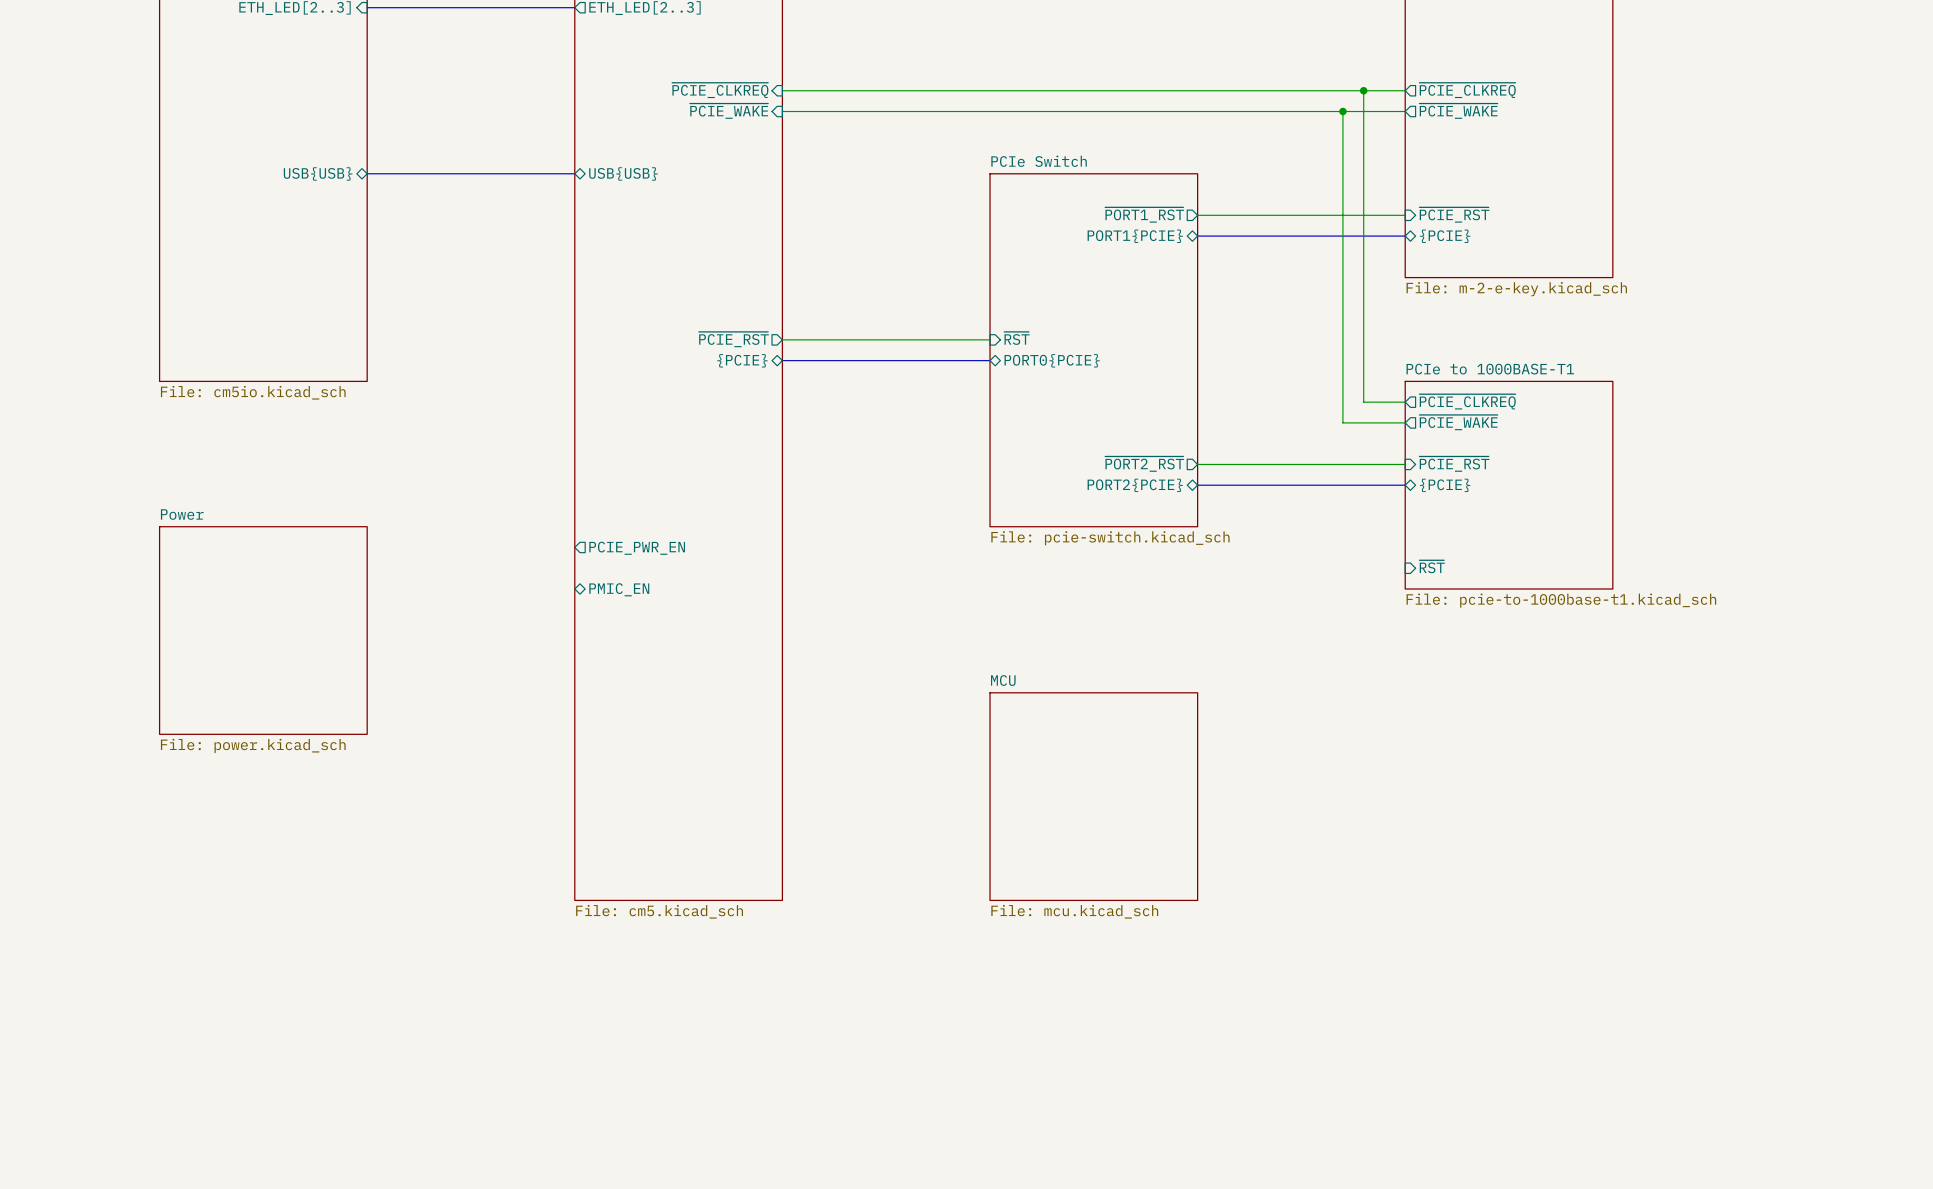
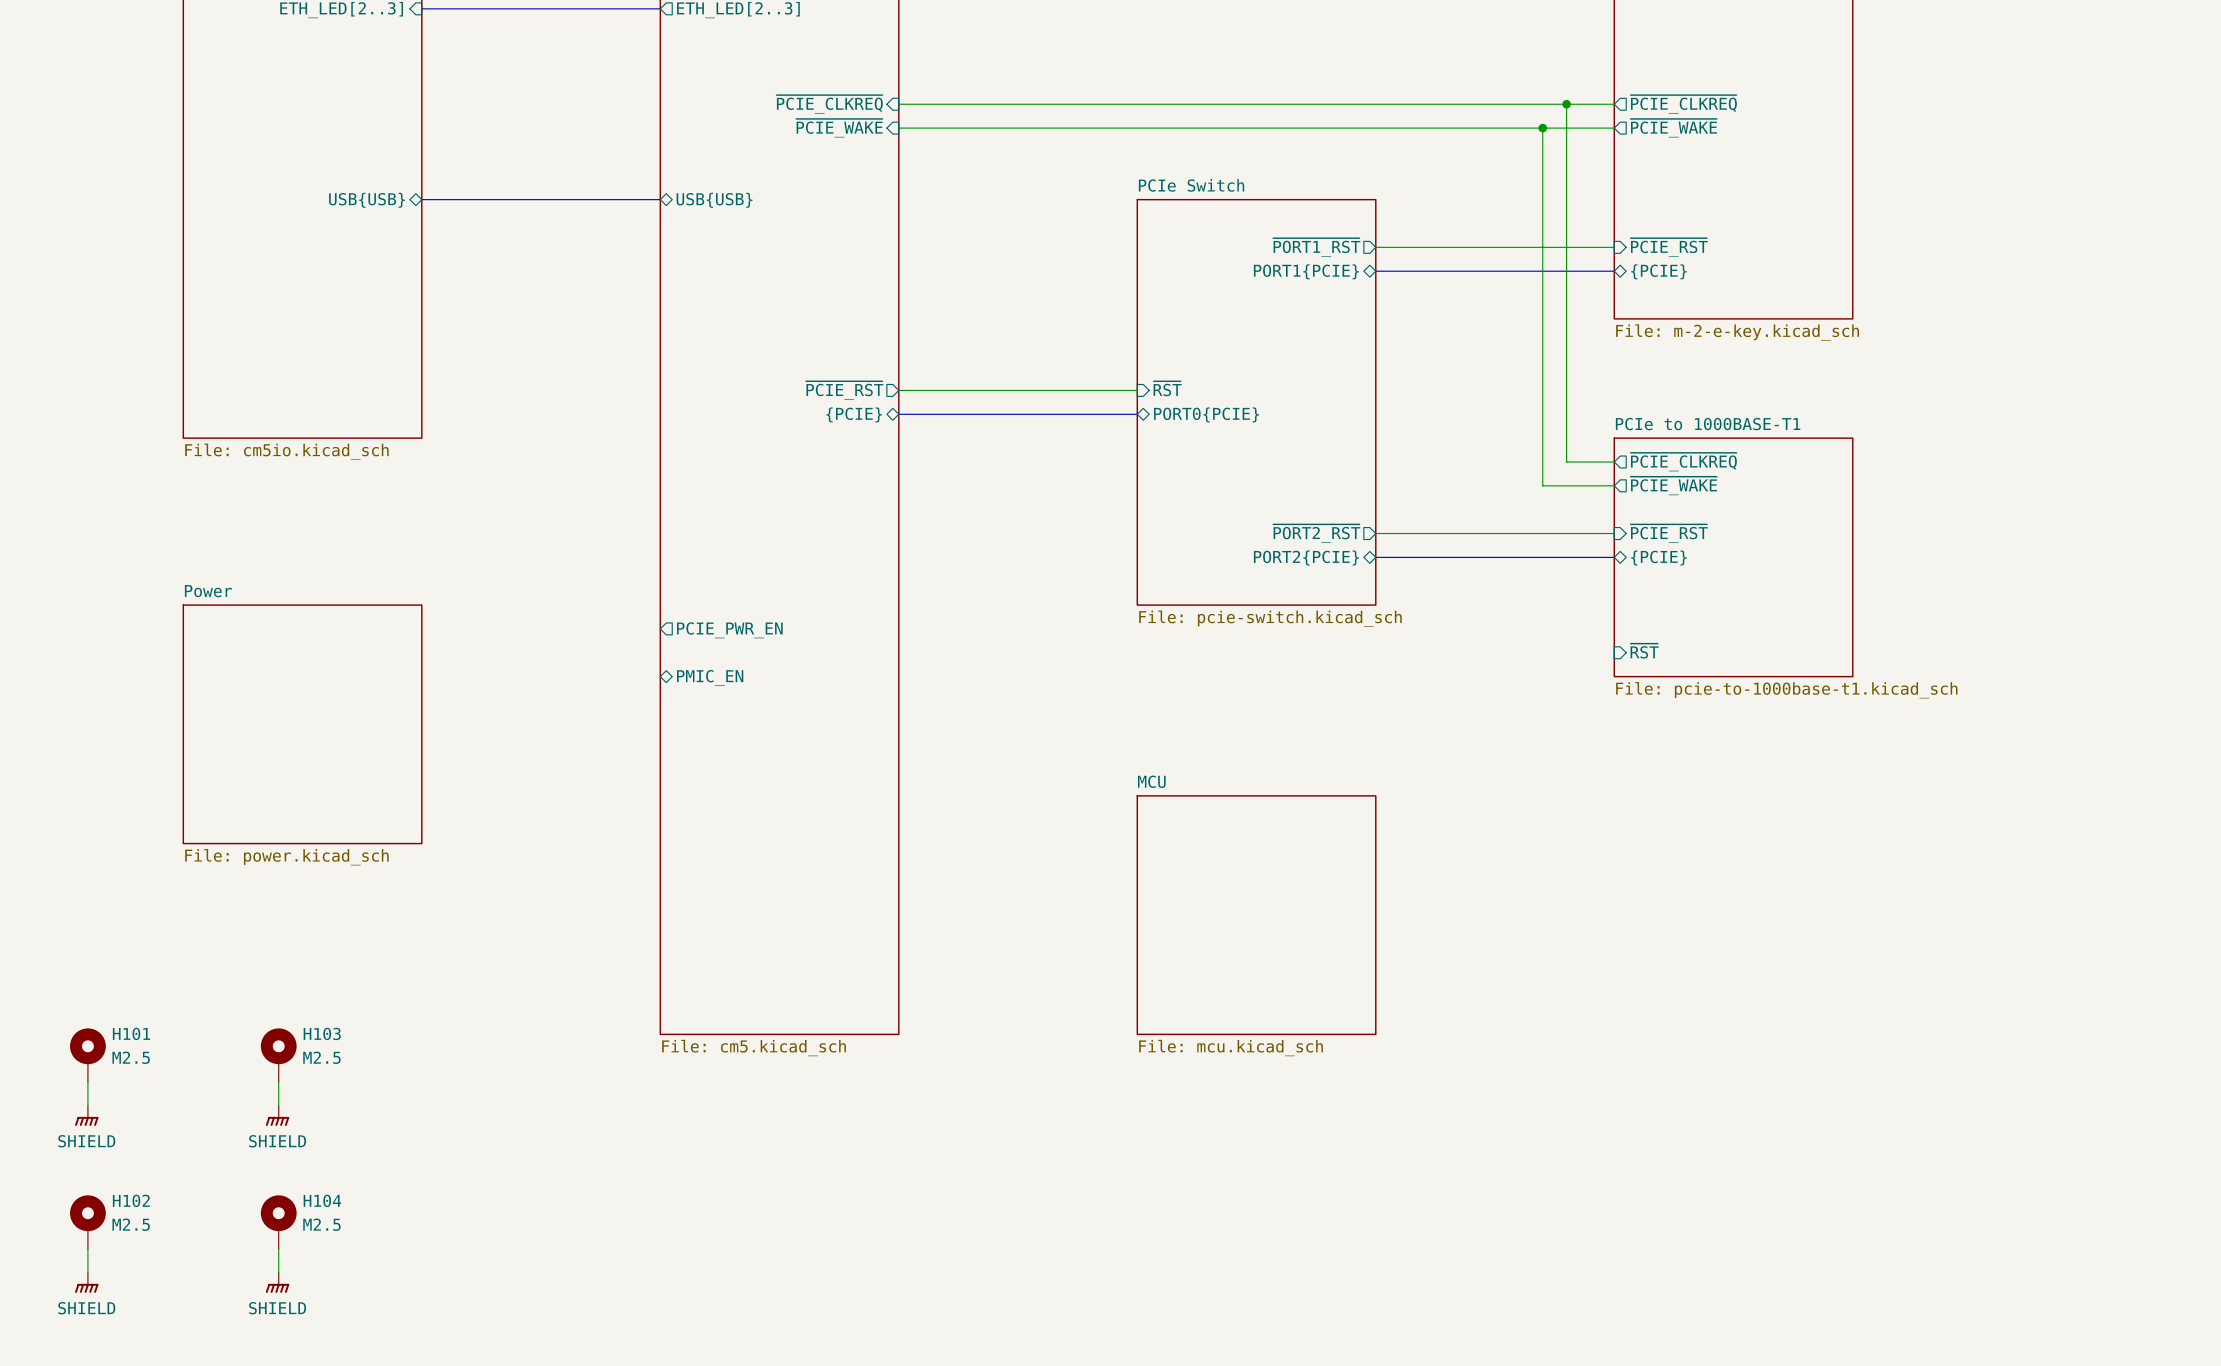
H101: none -> M2.5 (87, 1055)
H103: none -> M2.5 (278, 1055)
wire: none -> (87, 1082) (87, 1105)
wire: none -> (278, 1082) (278, 1105)
power symbol: none -> SHIELD (86, 1115)
power symbol: none -> SHIELD (277, 1115)
H102: none -> M2.5 (87, 1222)
H104: none -> M2.5 (278, 1222)
wire: none -> (87, 1249) (87, 1272)
wire: none -> (278, 1249) (278, 1272)
power symbol: none -> SHIELD (86, 1282)
power symbol: none -> SHIELD (277, 1282)

